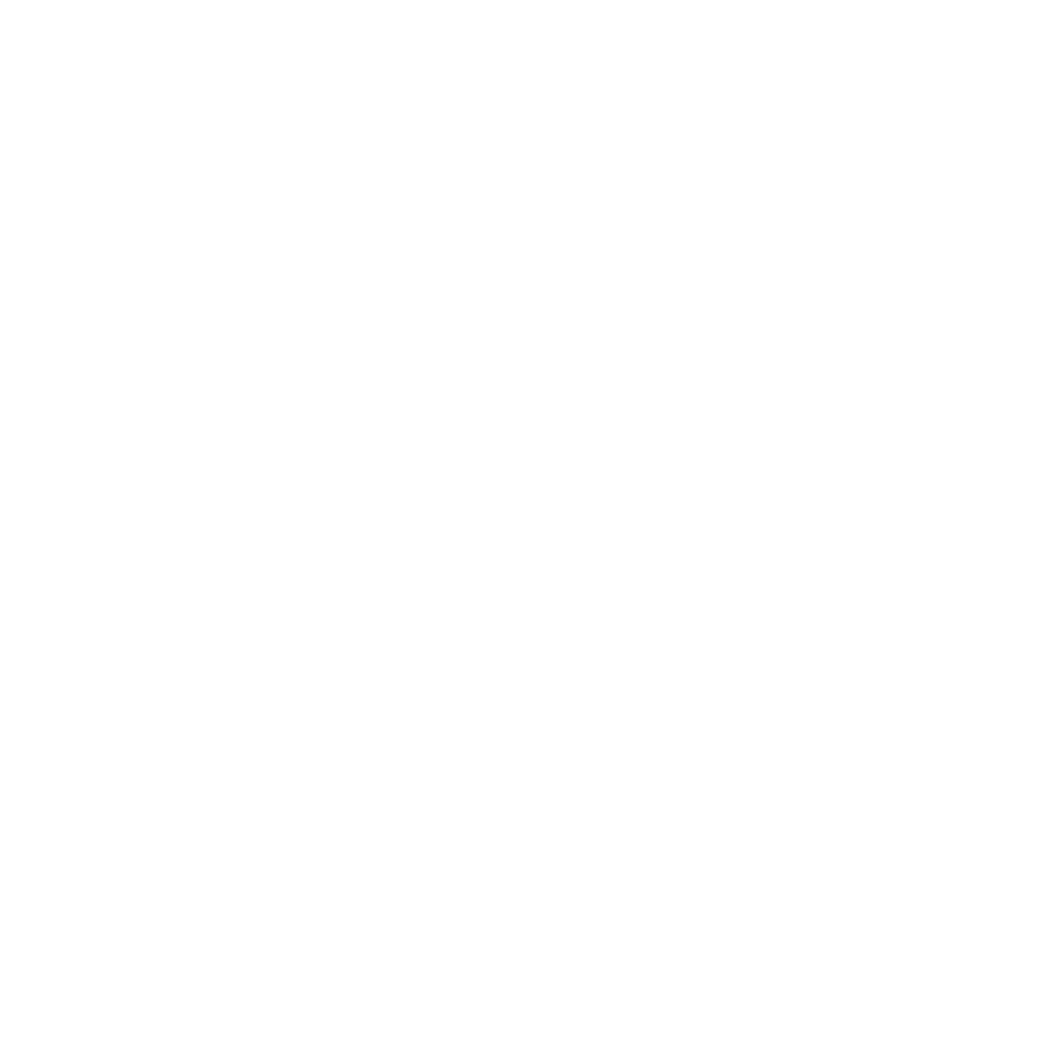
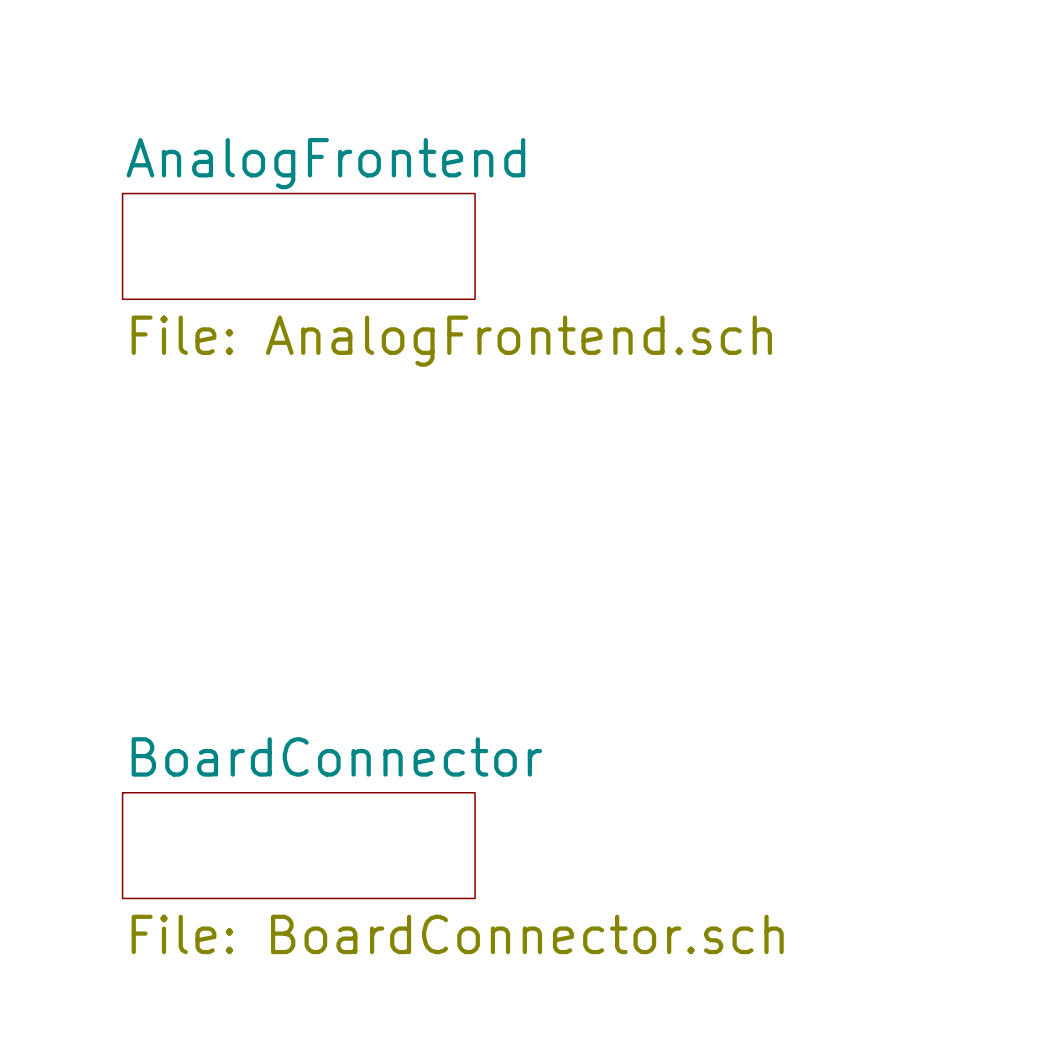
sheet AnalogFrontend: none -> File: AnalogFrontend.sch (298, 246)
sheet BoardConnector: none -> File: BoardConnector.sch (298, 845)

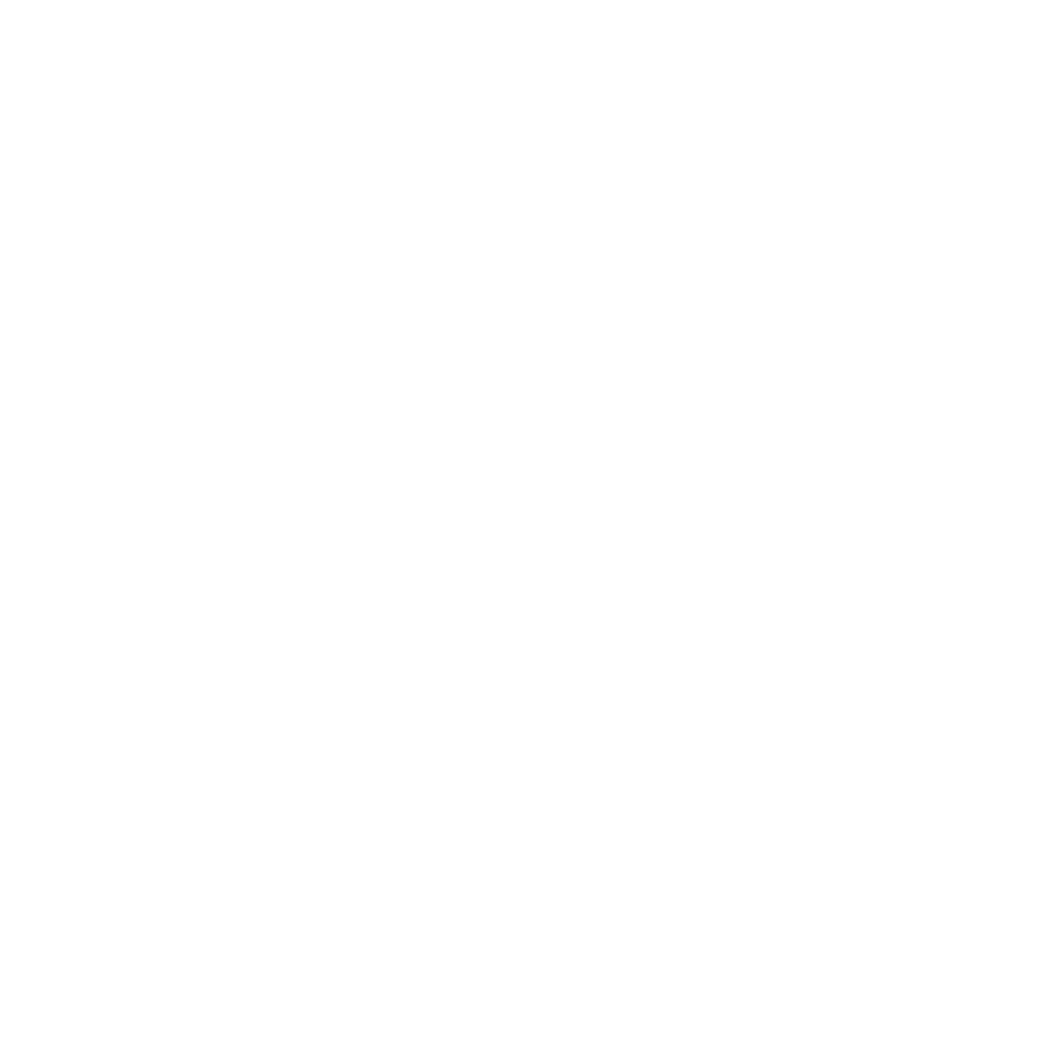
sheet AnalogFrontend: File: AnalogFrontend.sch (298, 246) -> none
sheet BoardConnector: File: BoardConnector.sch (298, 845) -> none

